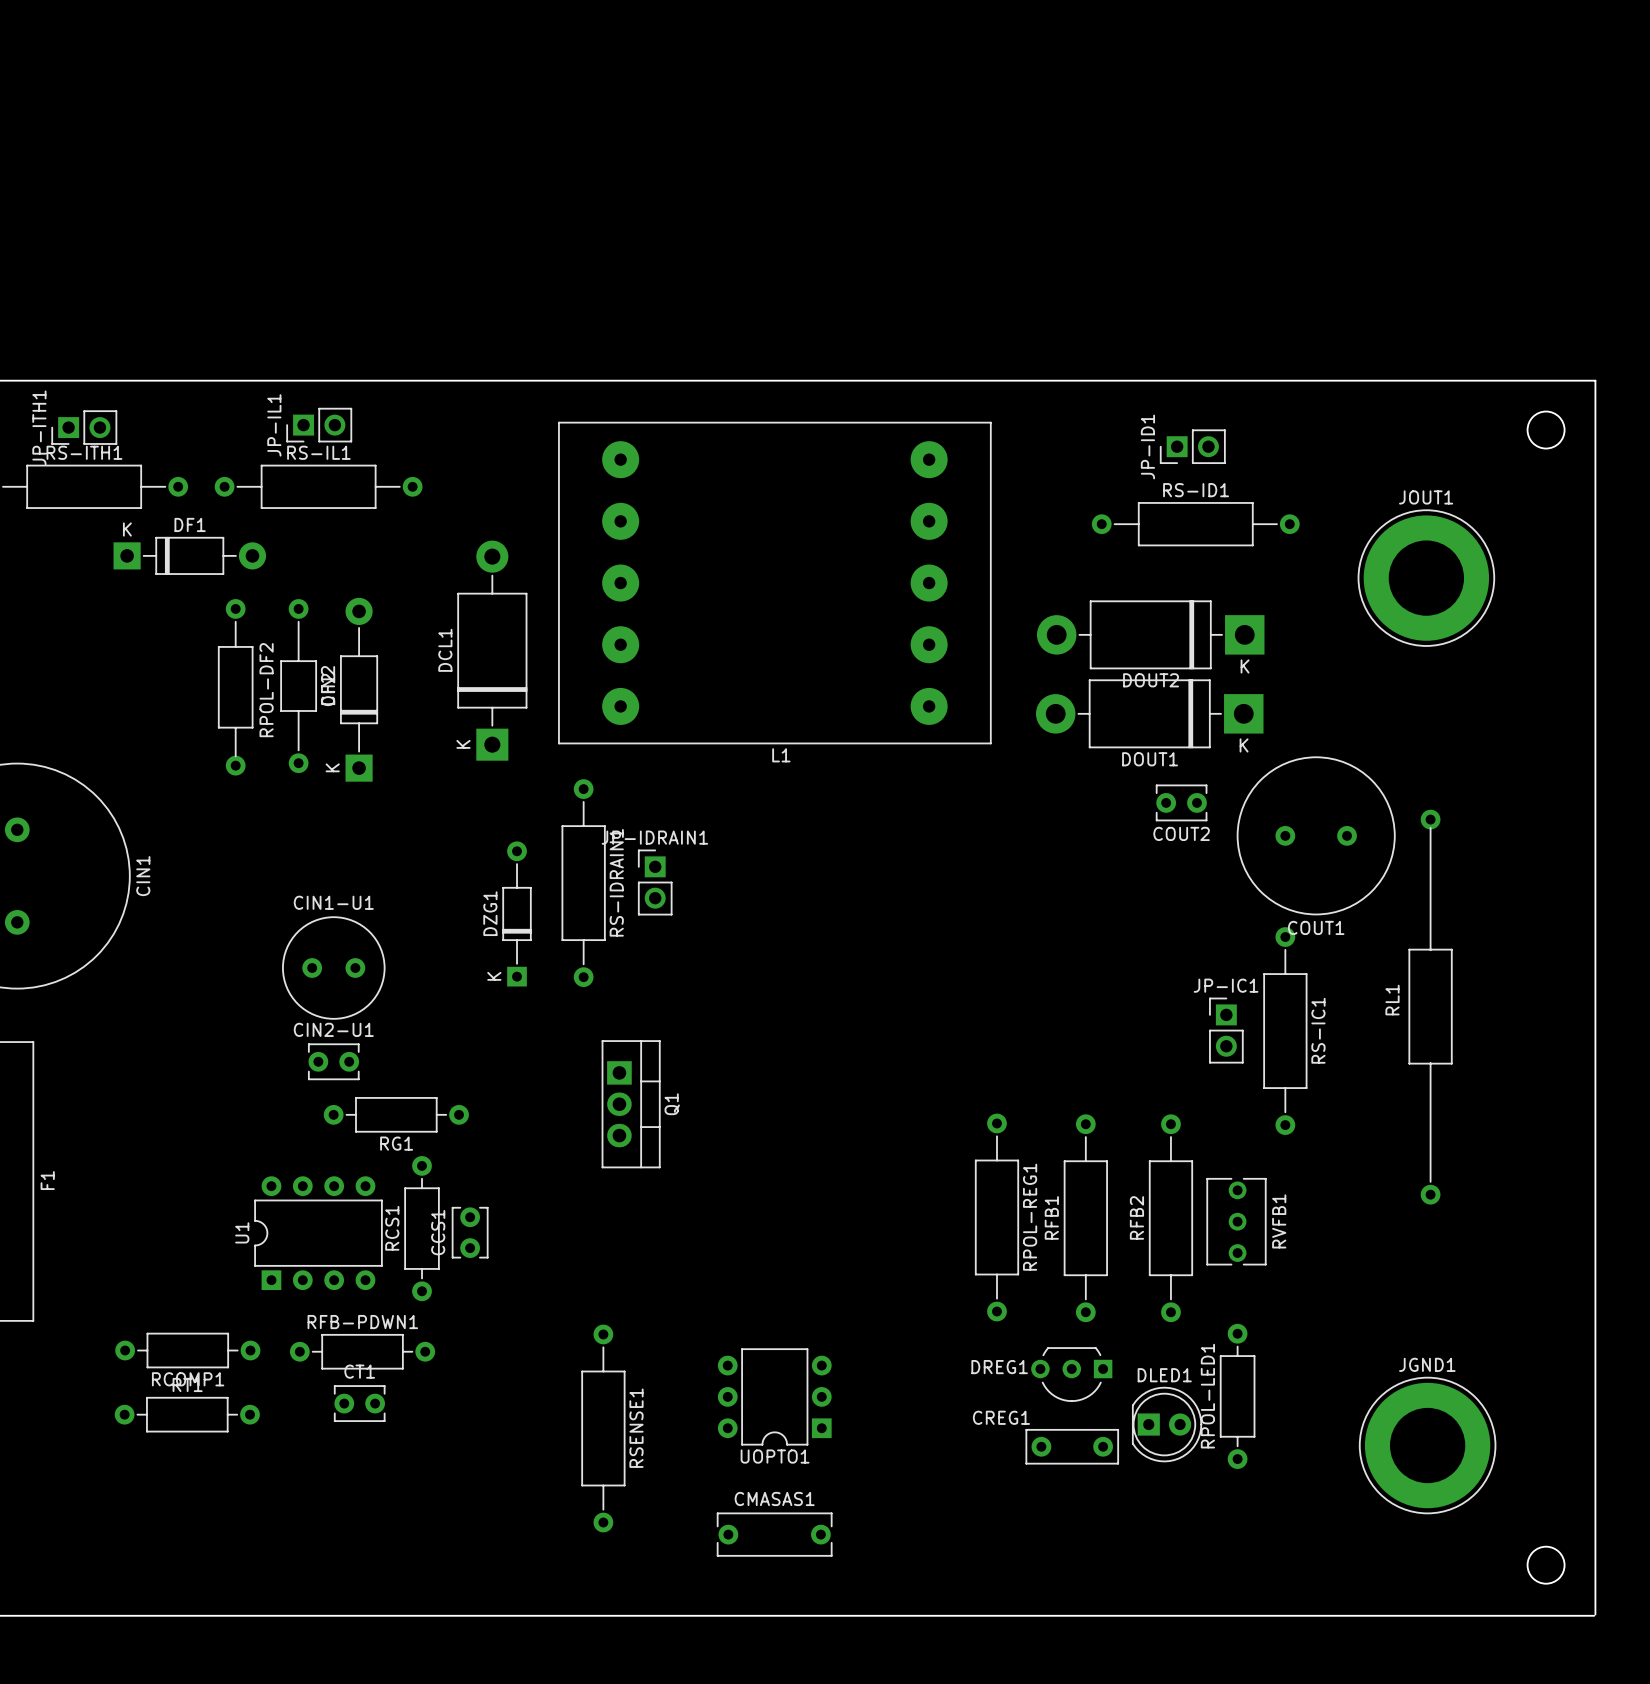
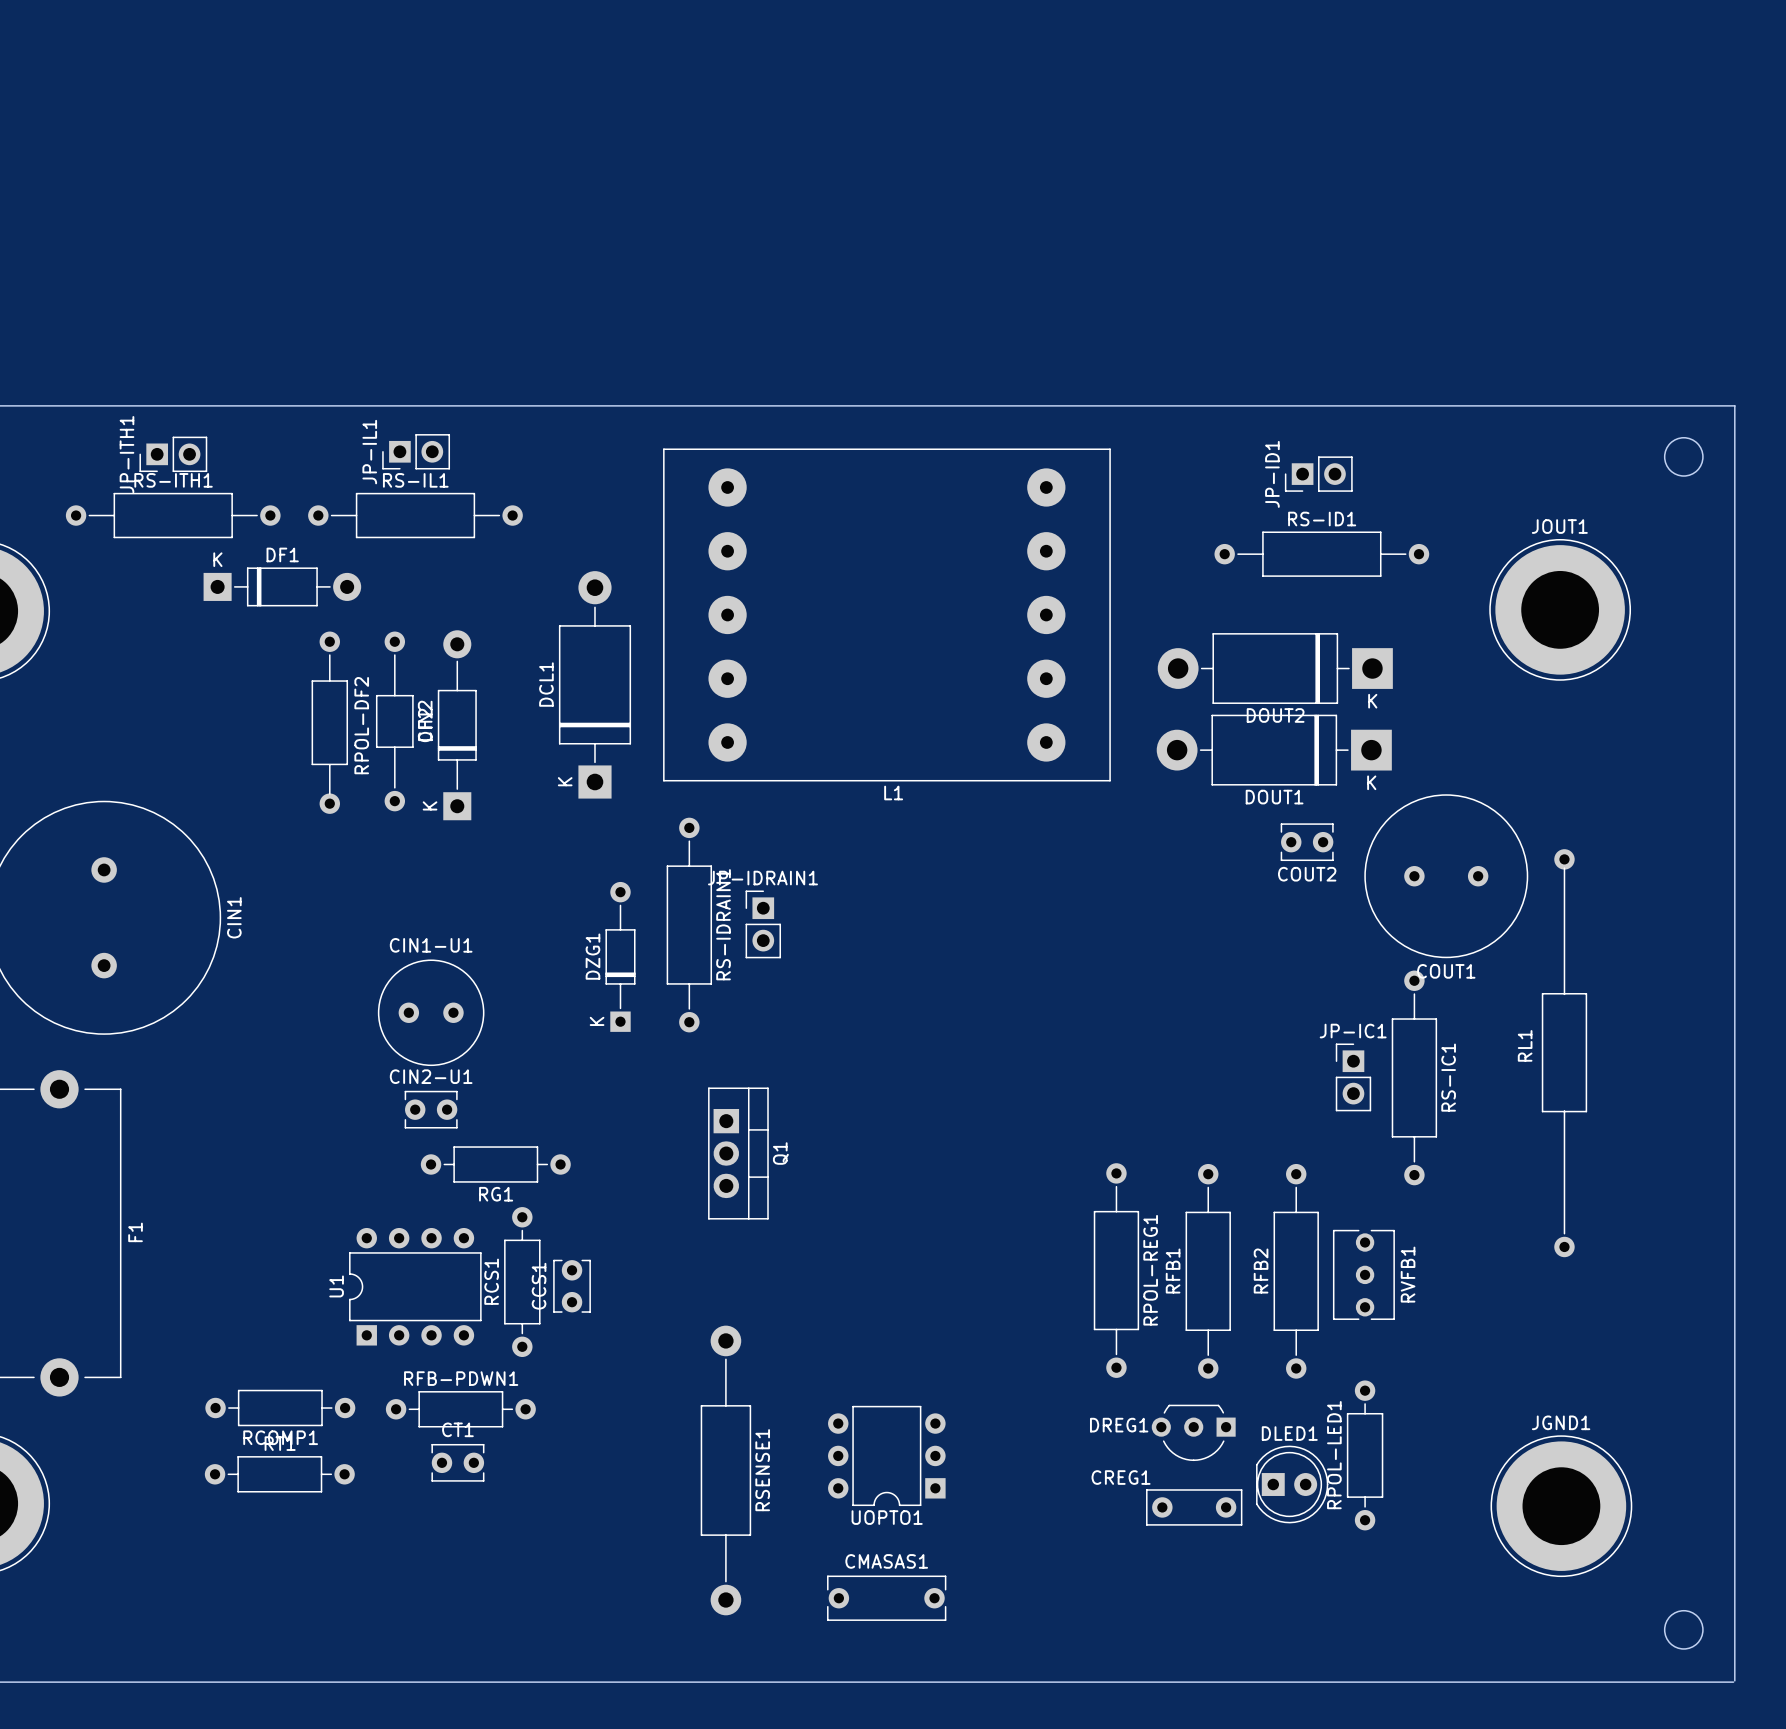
RSENSE1 footprint: [581, 1324, 626, 1533] -> [700, 1325, 752, 1616]

